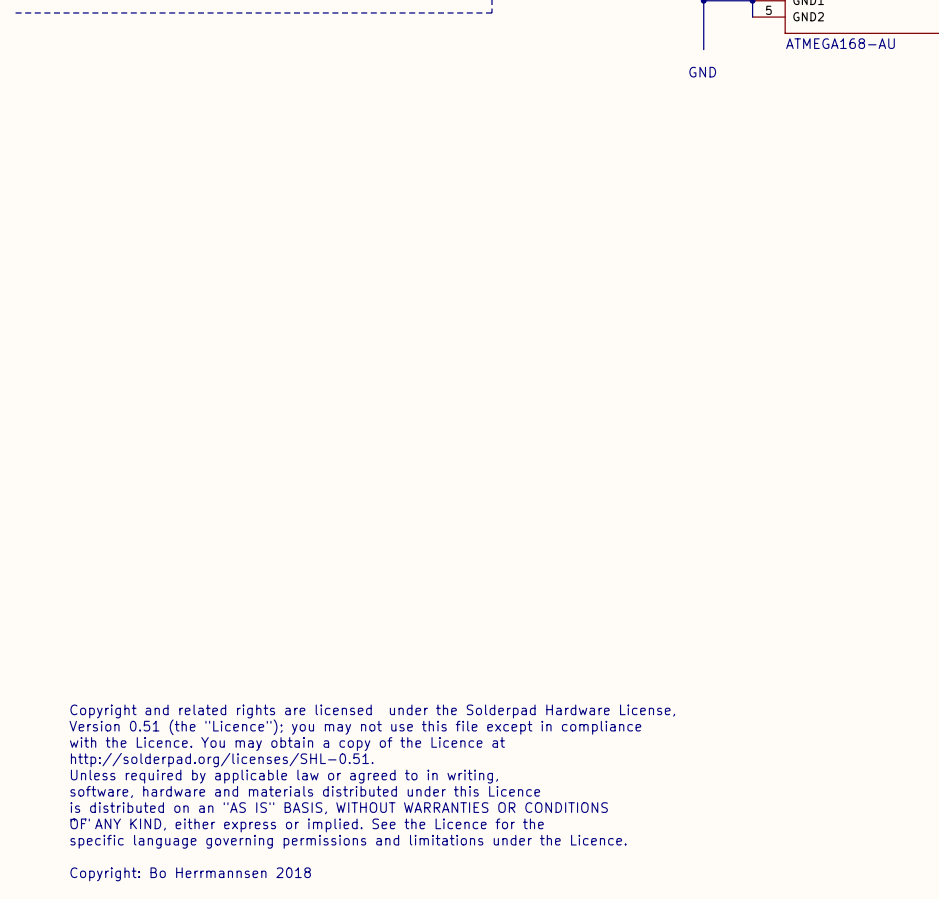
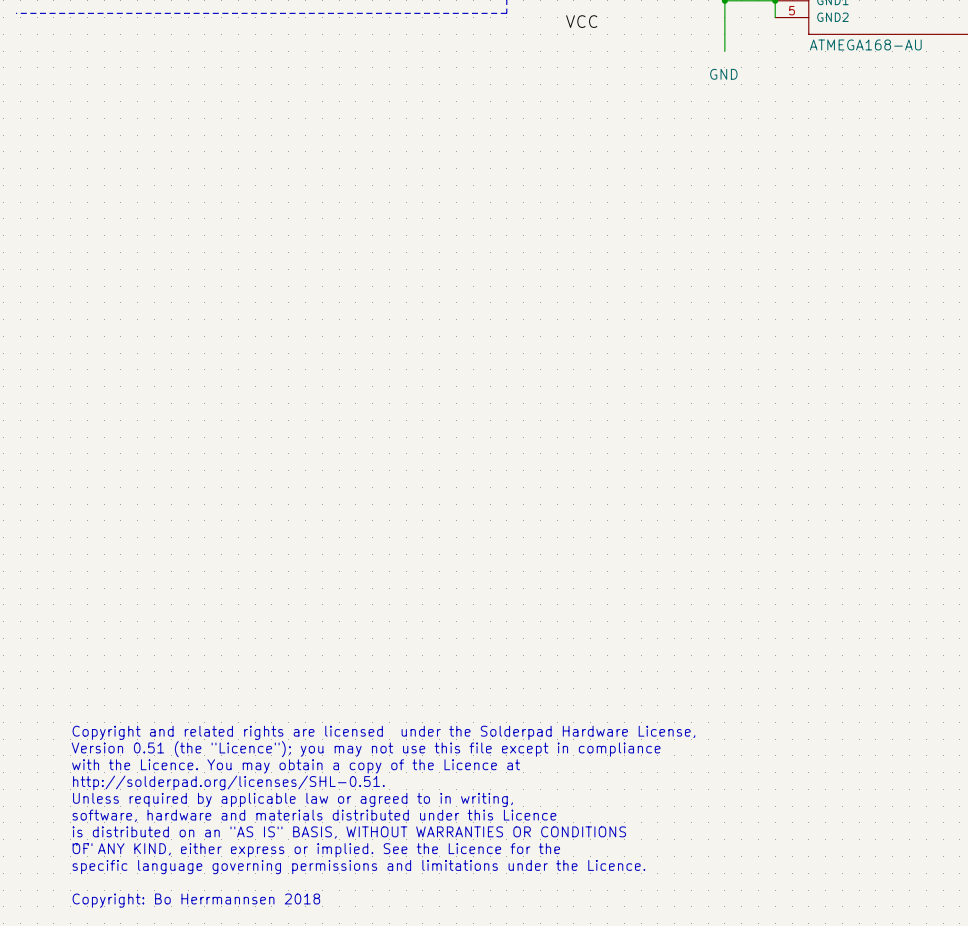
label: none -> VCC (581, 21)

